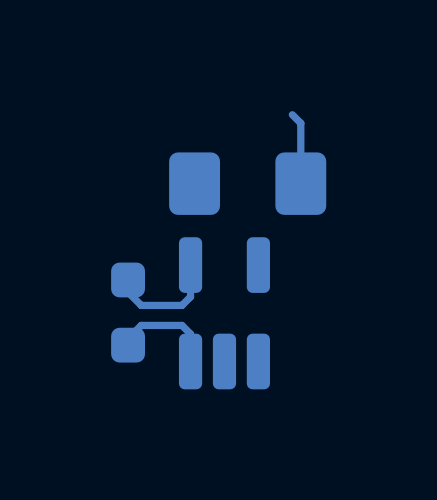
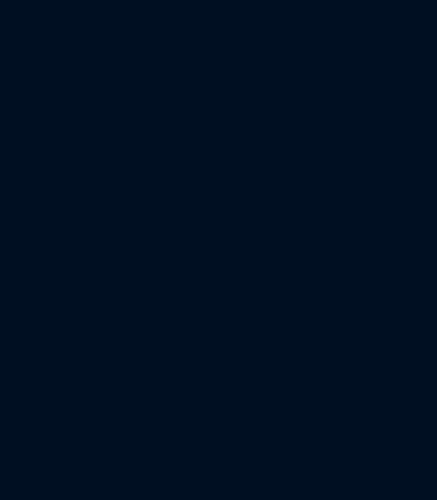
bottom track: (292, 114) (300, 123) (300, 183) -> none
part: (247, 183) -> none
bottom track: (190, 265) (190, 296) (181, 305) (141, 305) (128, 292) (128, 279) -> none
part: (128, 312) -> none
part: (224, 313) -> none
bottom track: (128, 338) (141, 325) (181, 325) (190, 333) (190, 365) -> none

